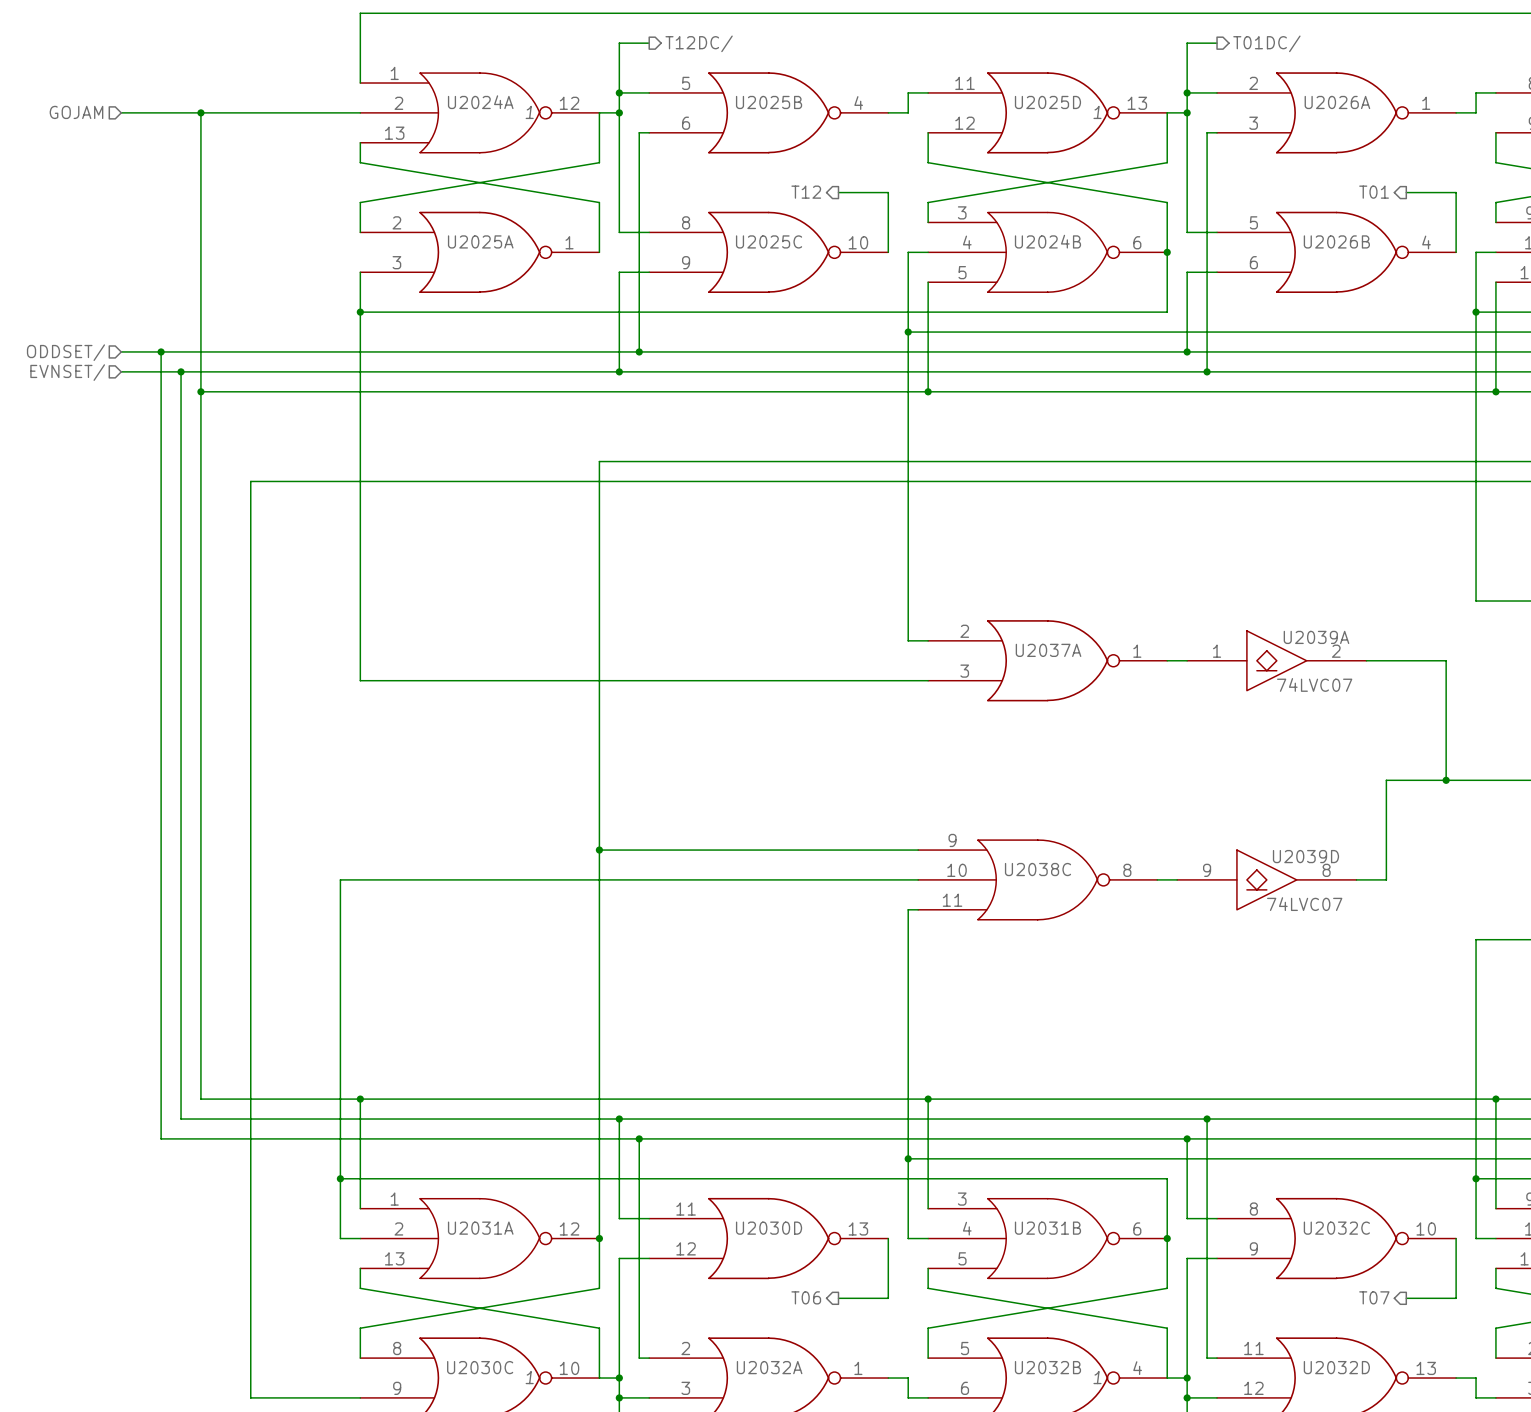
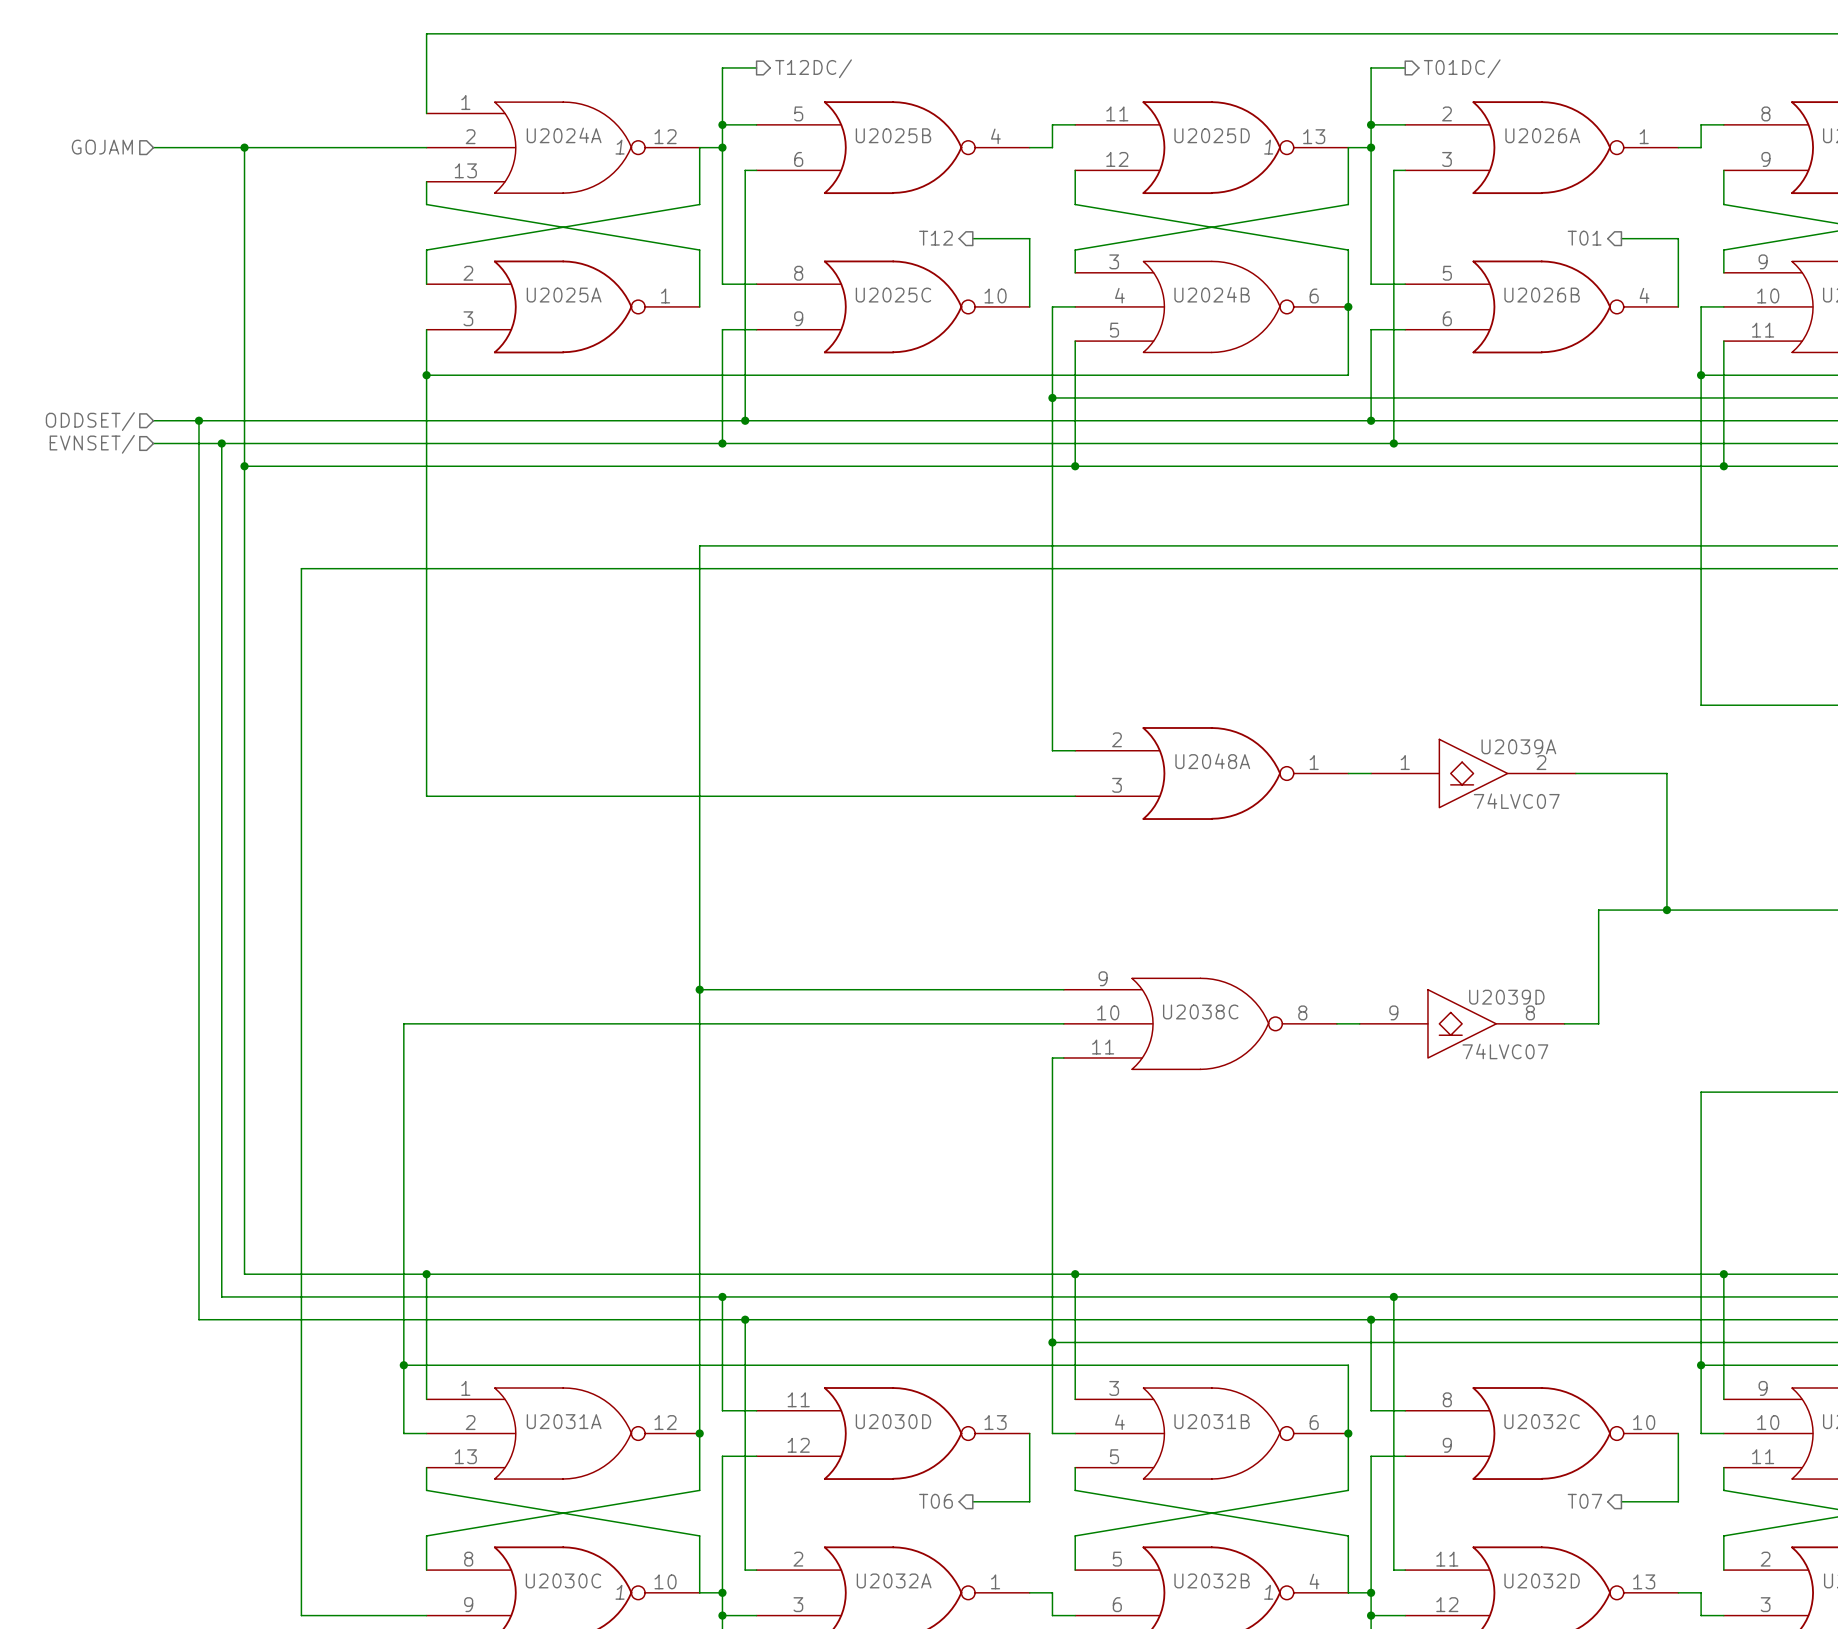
U2037A name: U2037A (1048, 650) -> U2048A (1212, 761)

